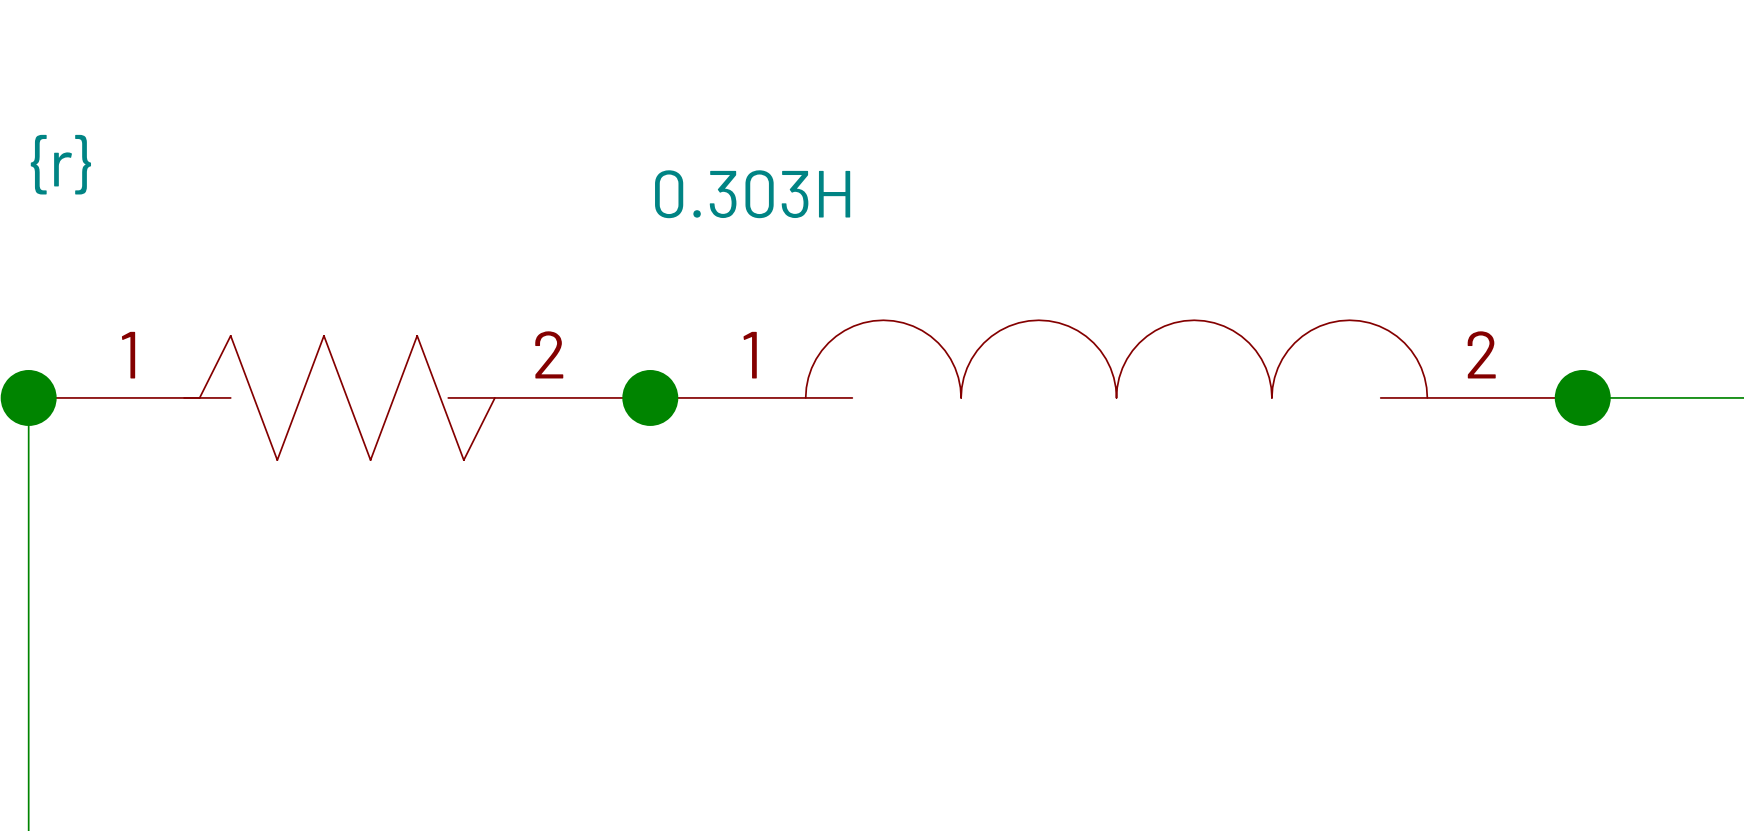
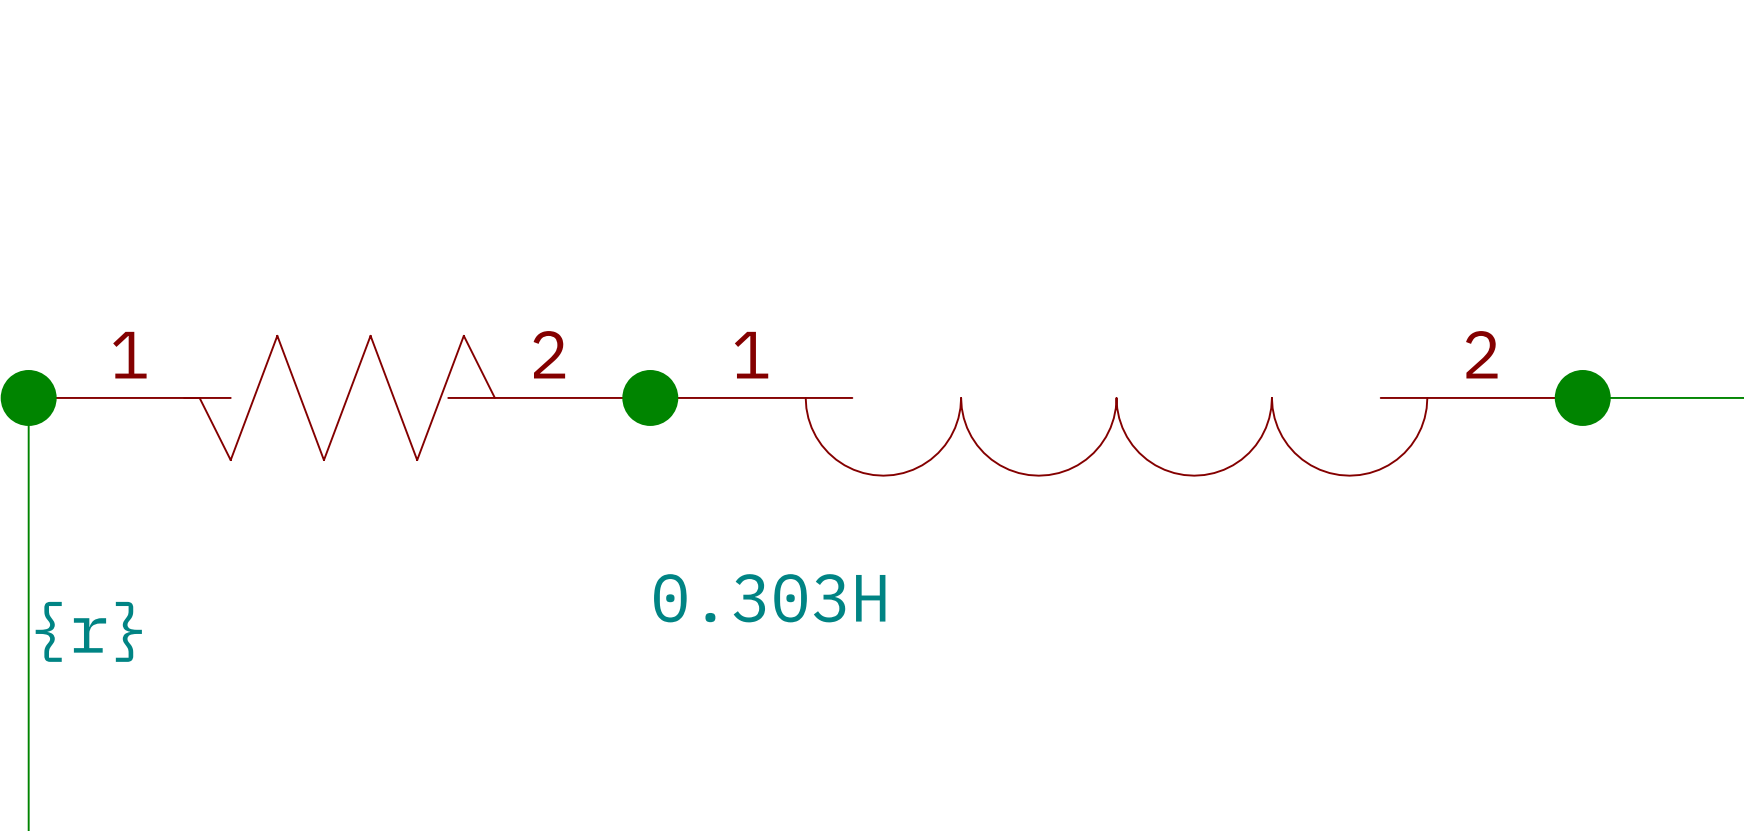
part: 0.303H (1116, 359) -> none
part flip: as is (339, 397) -> up-down (339, 397)
part: none -> 0.303H (1116, 436)

